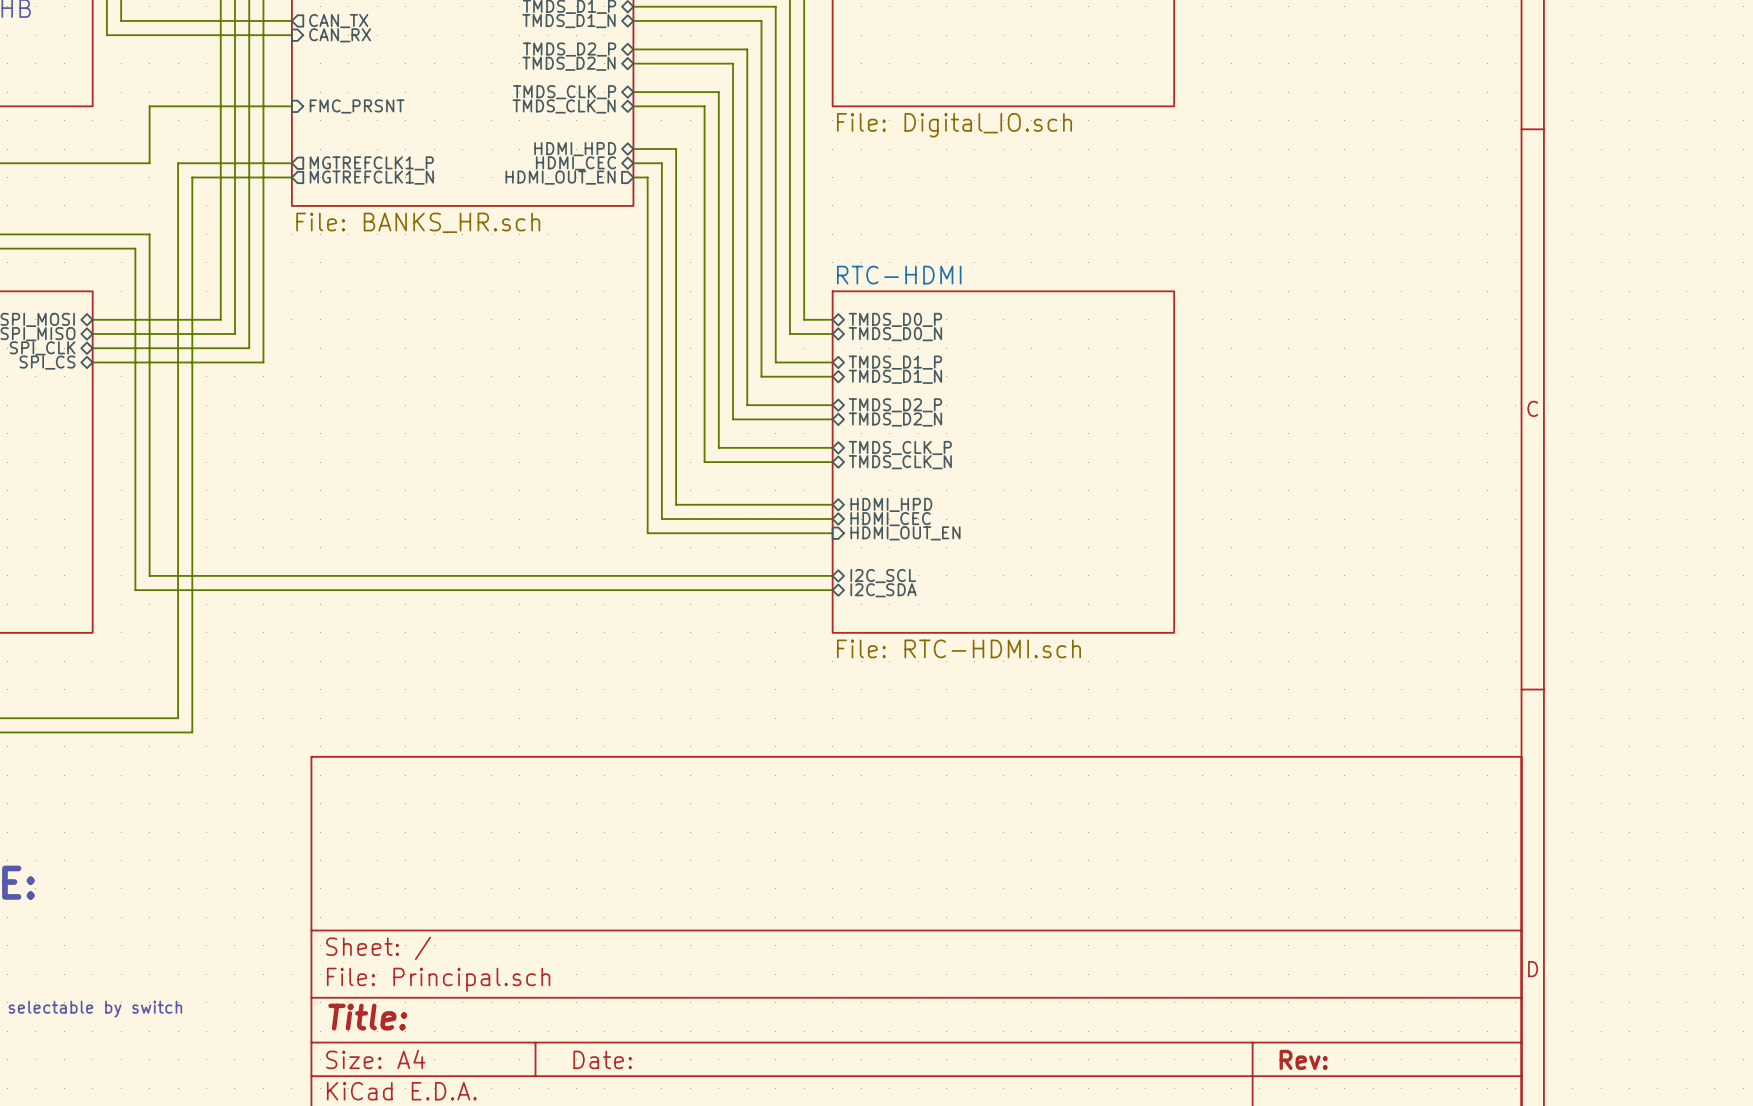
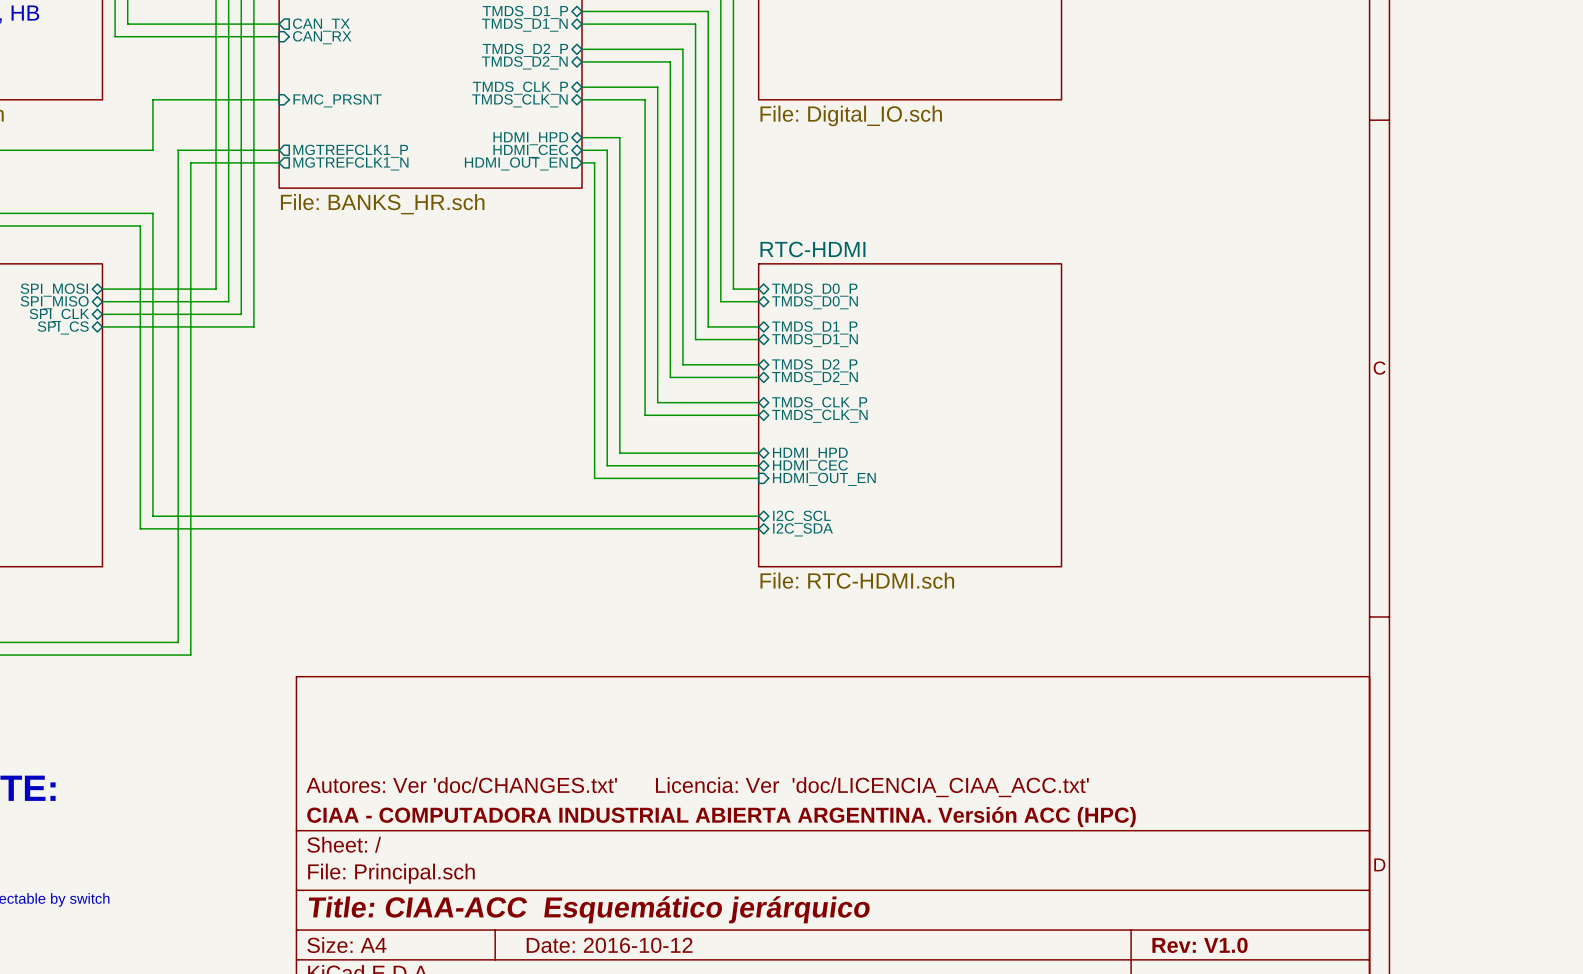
title block: none -> Autores: Ver 'doc/CHANGES.txt' Licencia: Ver 'doc/LICENCIA_CIAA_ACC.txt' (697, 787)
title block: none -> CIAA - COMPUTADORA INDUSTRIAL ABIERTA ARGENTINA. Versión ACC (HPC) (721, 816)
title block: Title: (367, 1017) -> Title: CIAA-ACC Esquemático jerárquico (589, 909)
title block: Date: (602, 1059) -> Date: 2016-10-12 (609, 945)
title block: Rev: (1303, 1059) -> Rev: V1.0 (1200, 945)

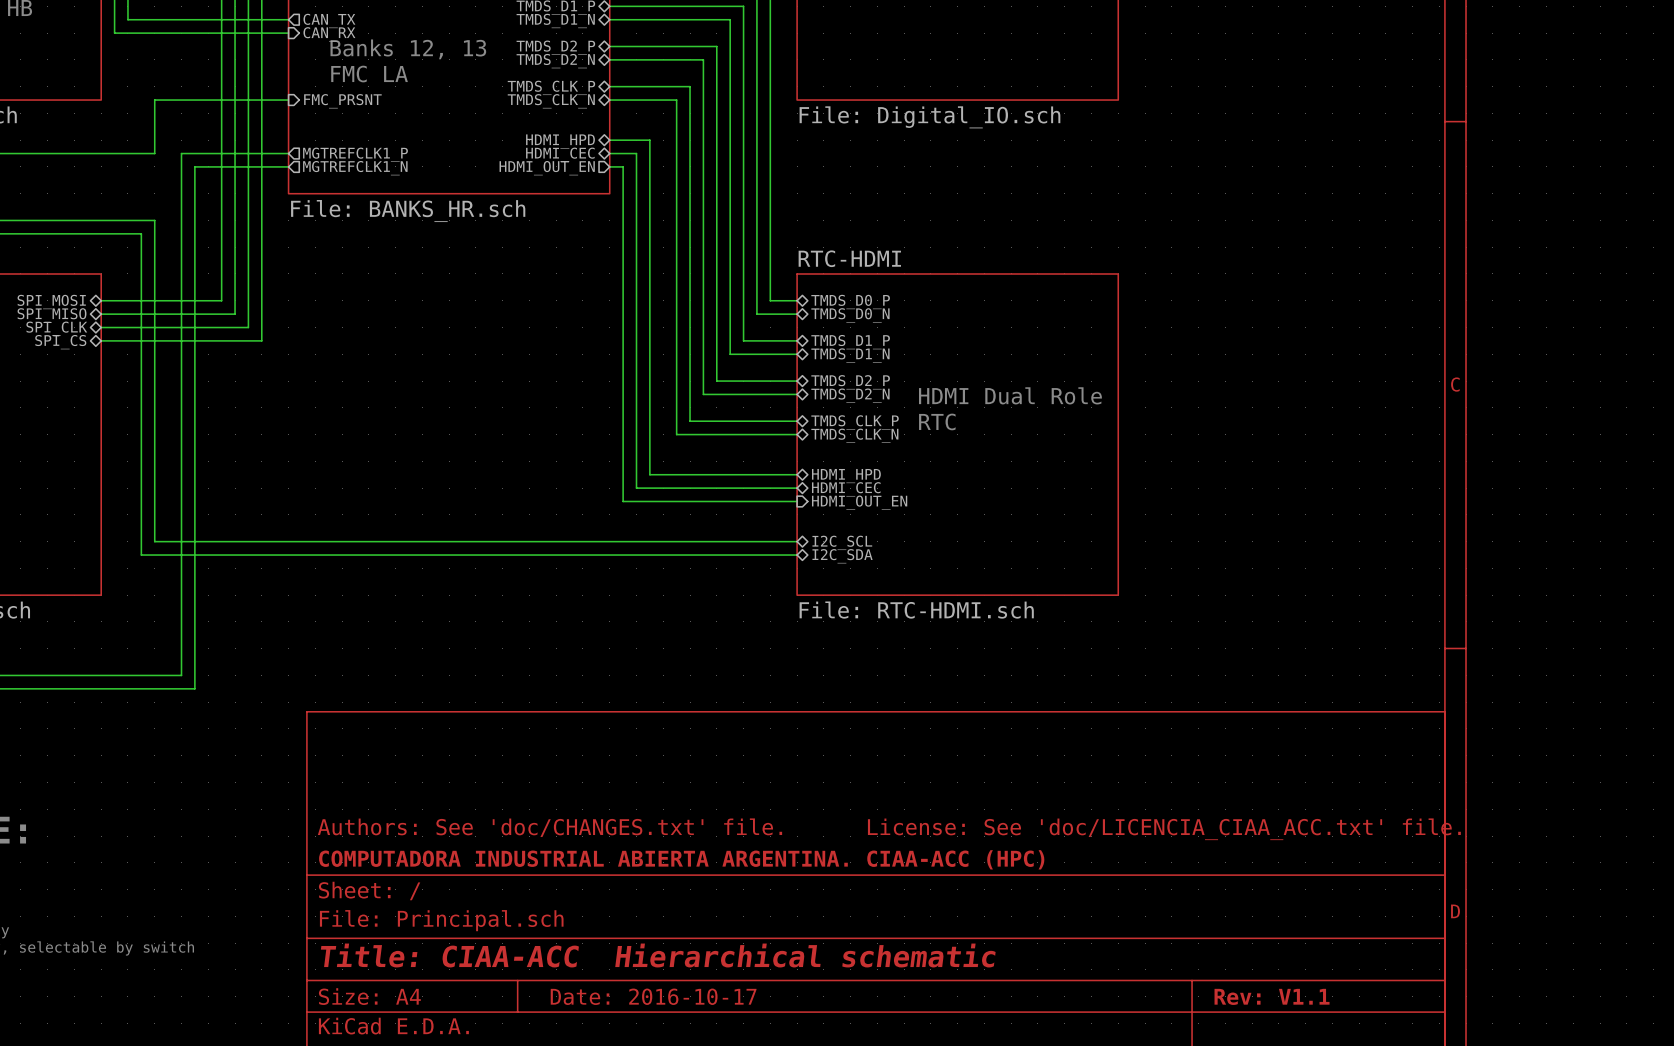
text: none -> Banks 12, 13 (408, 49)
text: none -> FMC LA (369, 74)
text: none -> HDMI Dual Role (1010, 395)
text: none -> RTC (937, 421)
title block: Autores: Ver 'doc/CHANGES.txt' Licencia: Ver 'doc/LICENCIA_CIAA_ACC.txt' (697, 787) -> Authors: See 'doc/CHANGES.txt' file. License: See 'doc/LICENCIA_CIAA_ACC.txt' file. (889, 829)
title block: CIAA - COMPUTADORA INDUSTRIAL ABIERTA ARGENTINA. Versión ACC (HPC) (721, 816) -> COMPUTADORA INDUSTRIAL ABIERTA ARGENTINA. CIAA-ACC (HPC) (681, 859)
title block: Title: CIAA-ACC Esquemático jerárquico (589, 909) -> Title: CIAA-ACC Hierarchical schematic (658, 955)
title block: Date: 2016-10-12 (609, 945) -> Date: 2016-10-17 (653, 996)
title block: Rev: V1.0 (1200, 945) -> Rev: V1.1 (1272, 996)

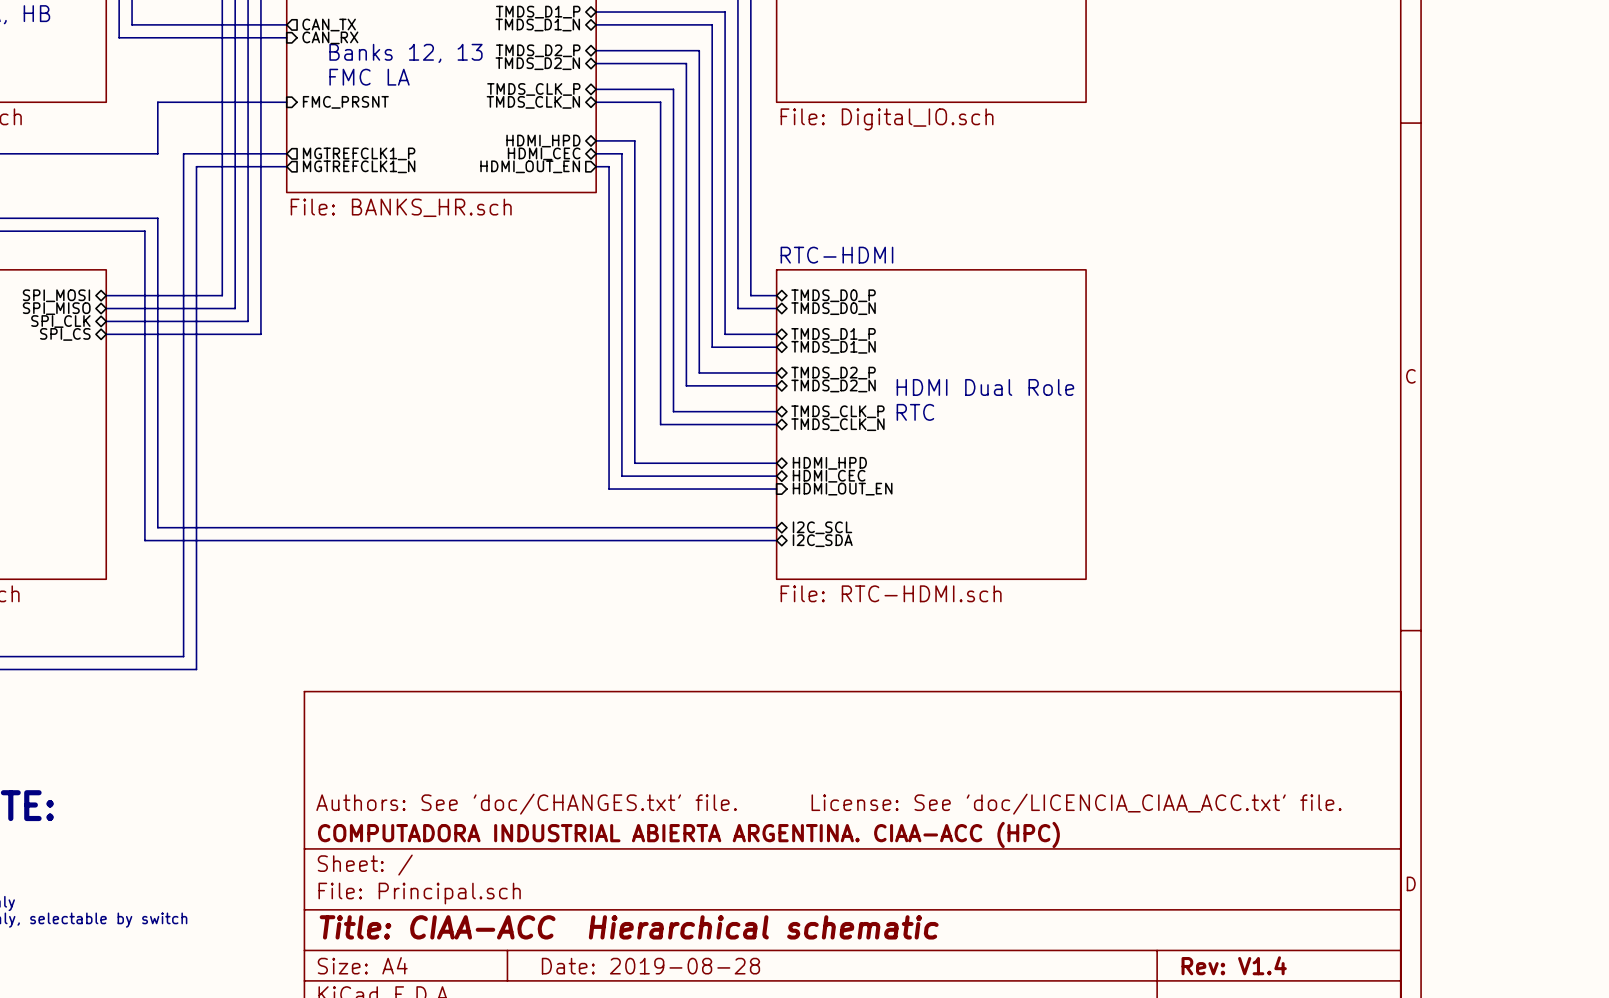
title block: Date: 2016-10-17 (653, 996) -> Date: 2019-08-28 (650, 966)
title block: Rev: V1.1 (1272, 996) -> Rev: V1.4 (1234, 965)

